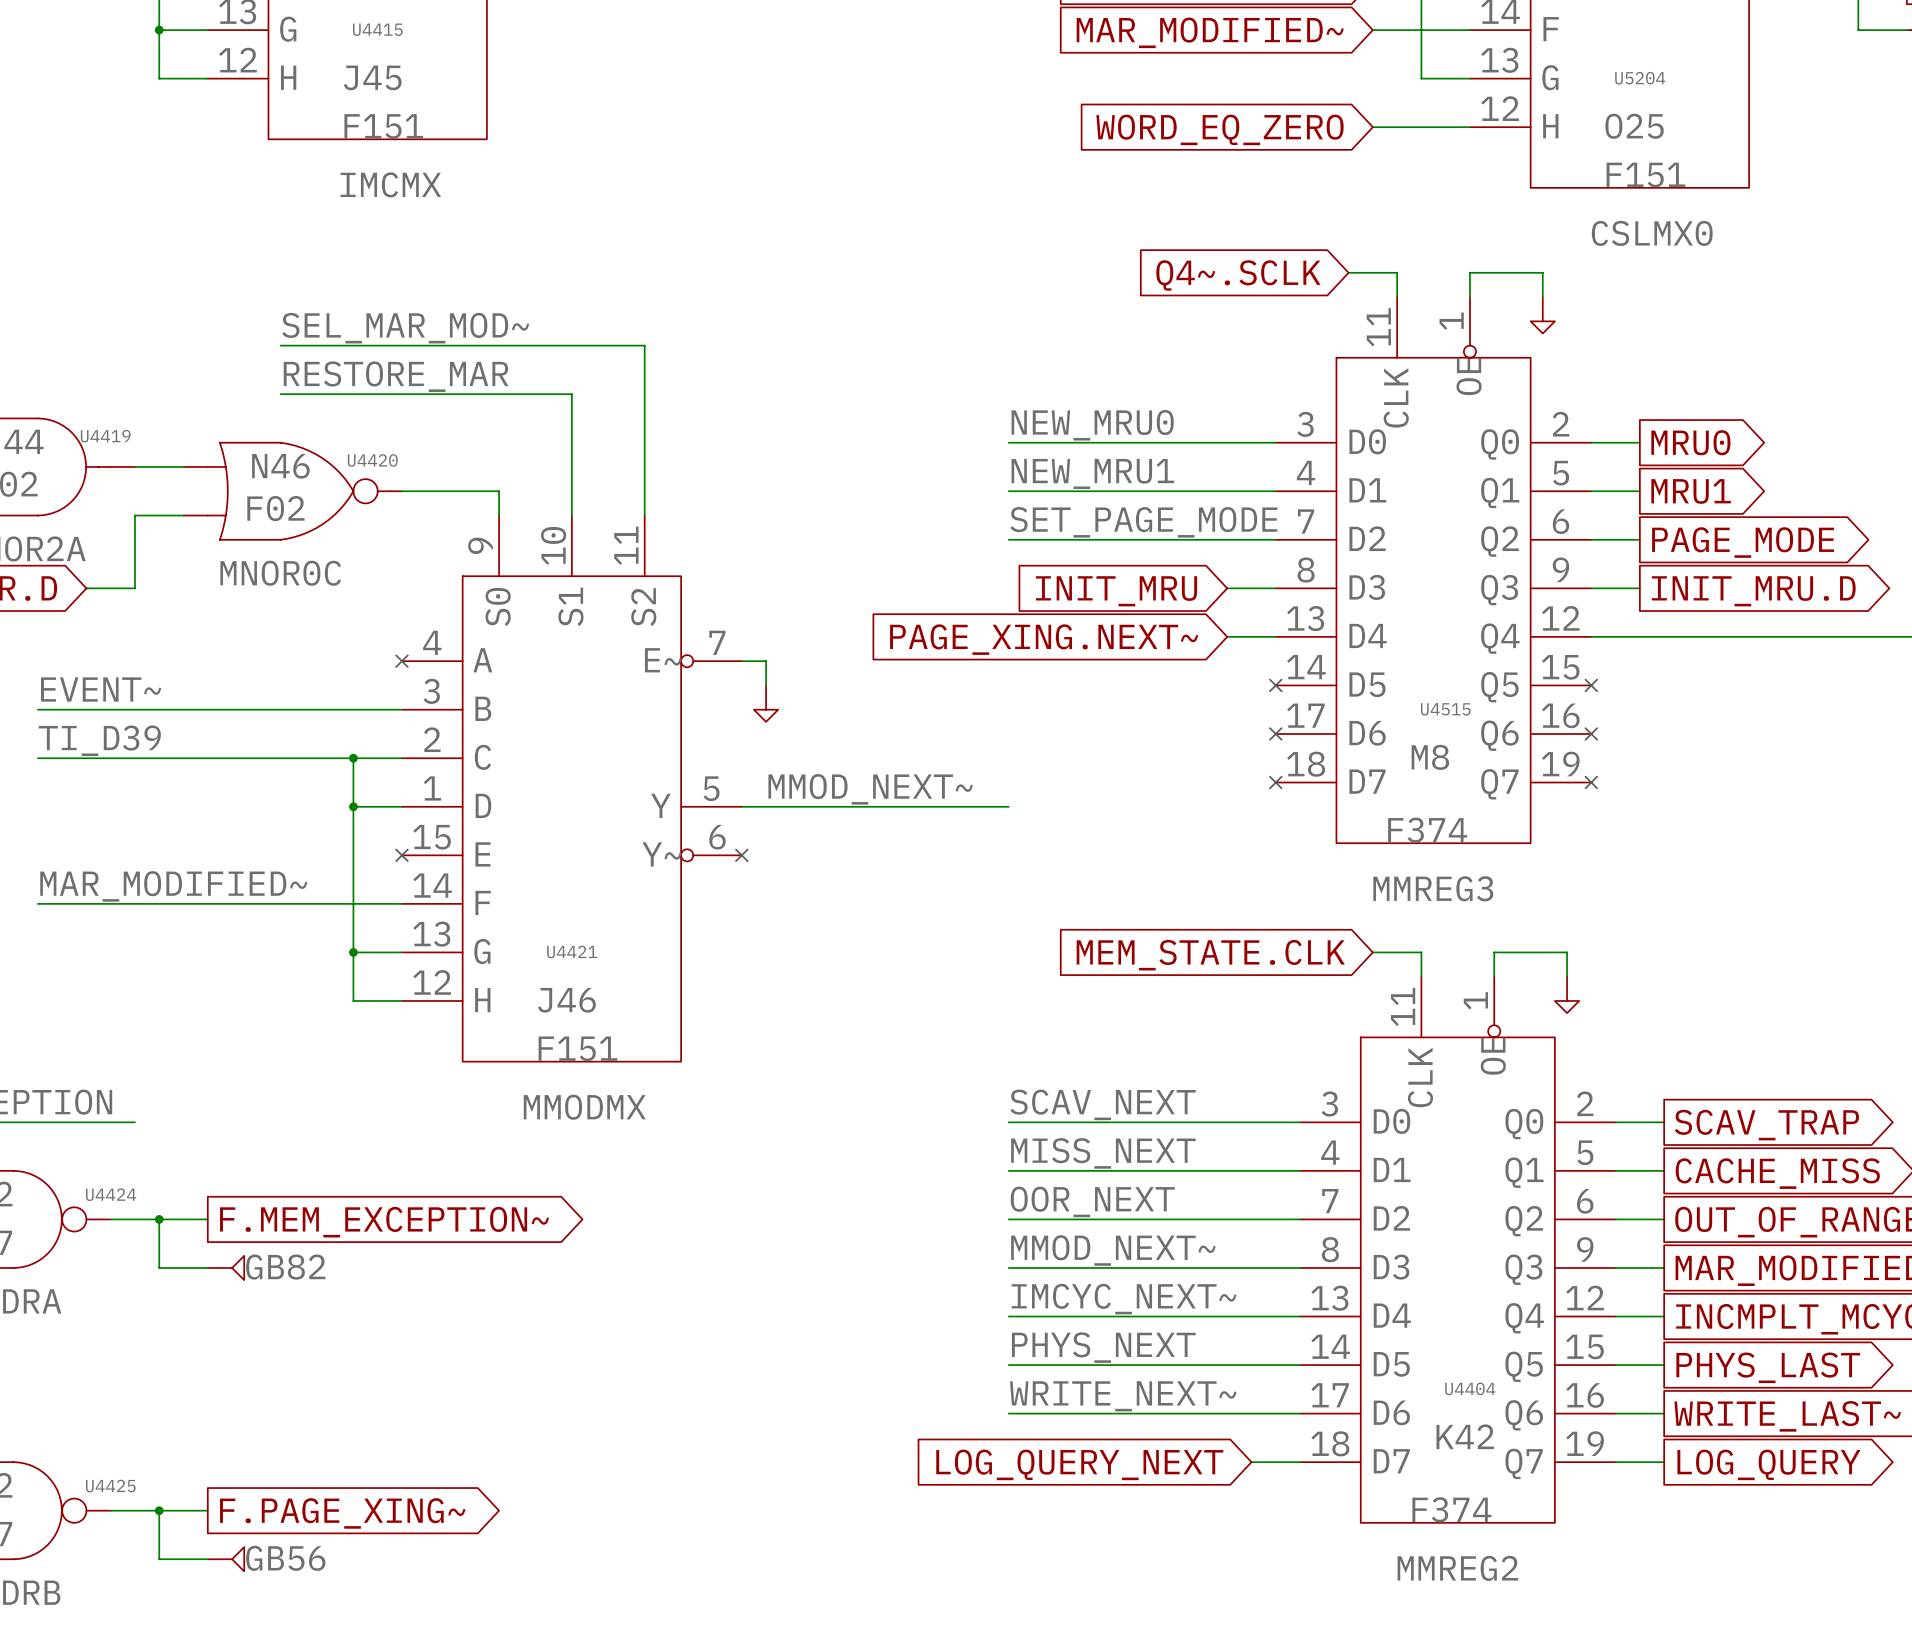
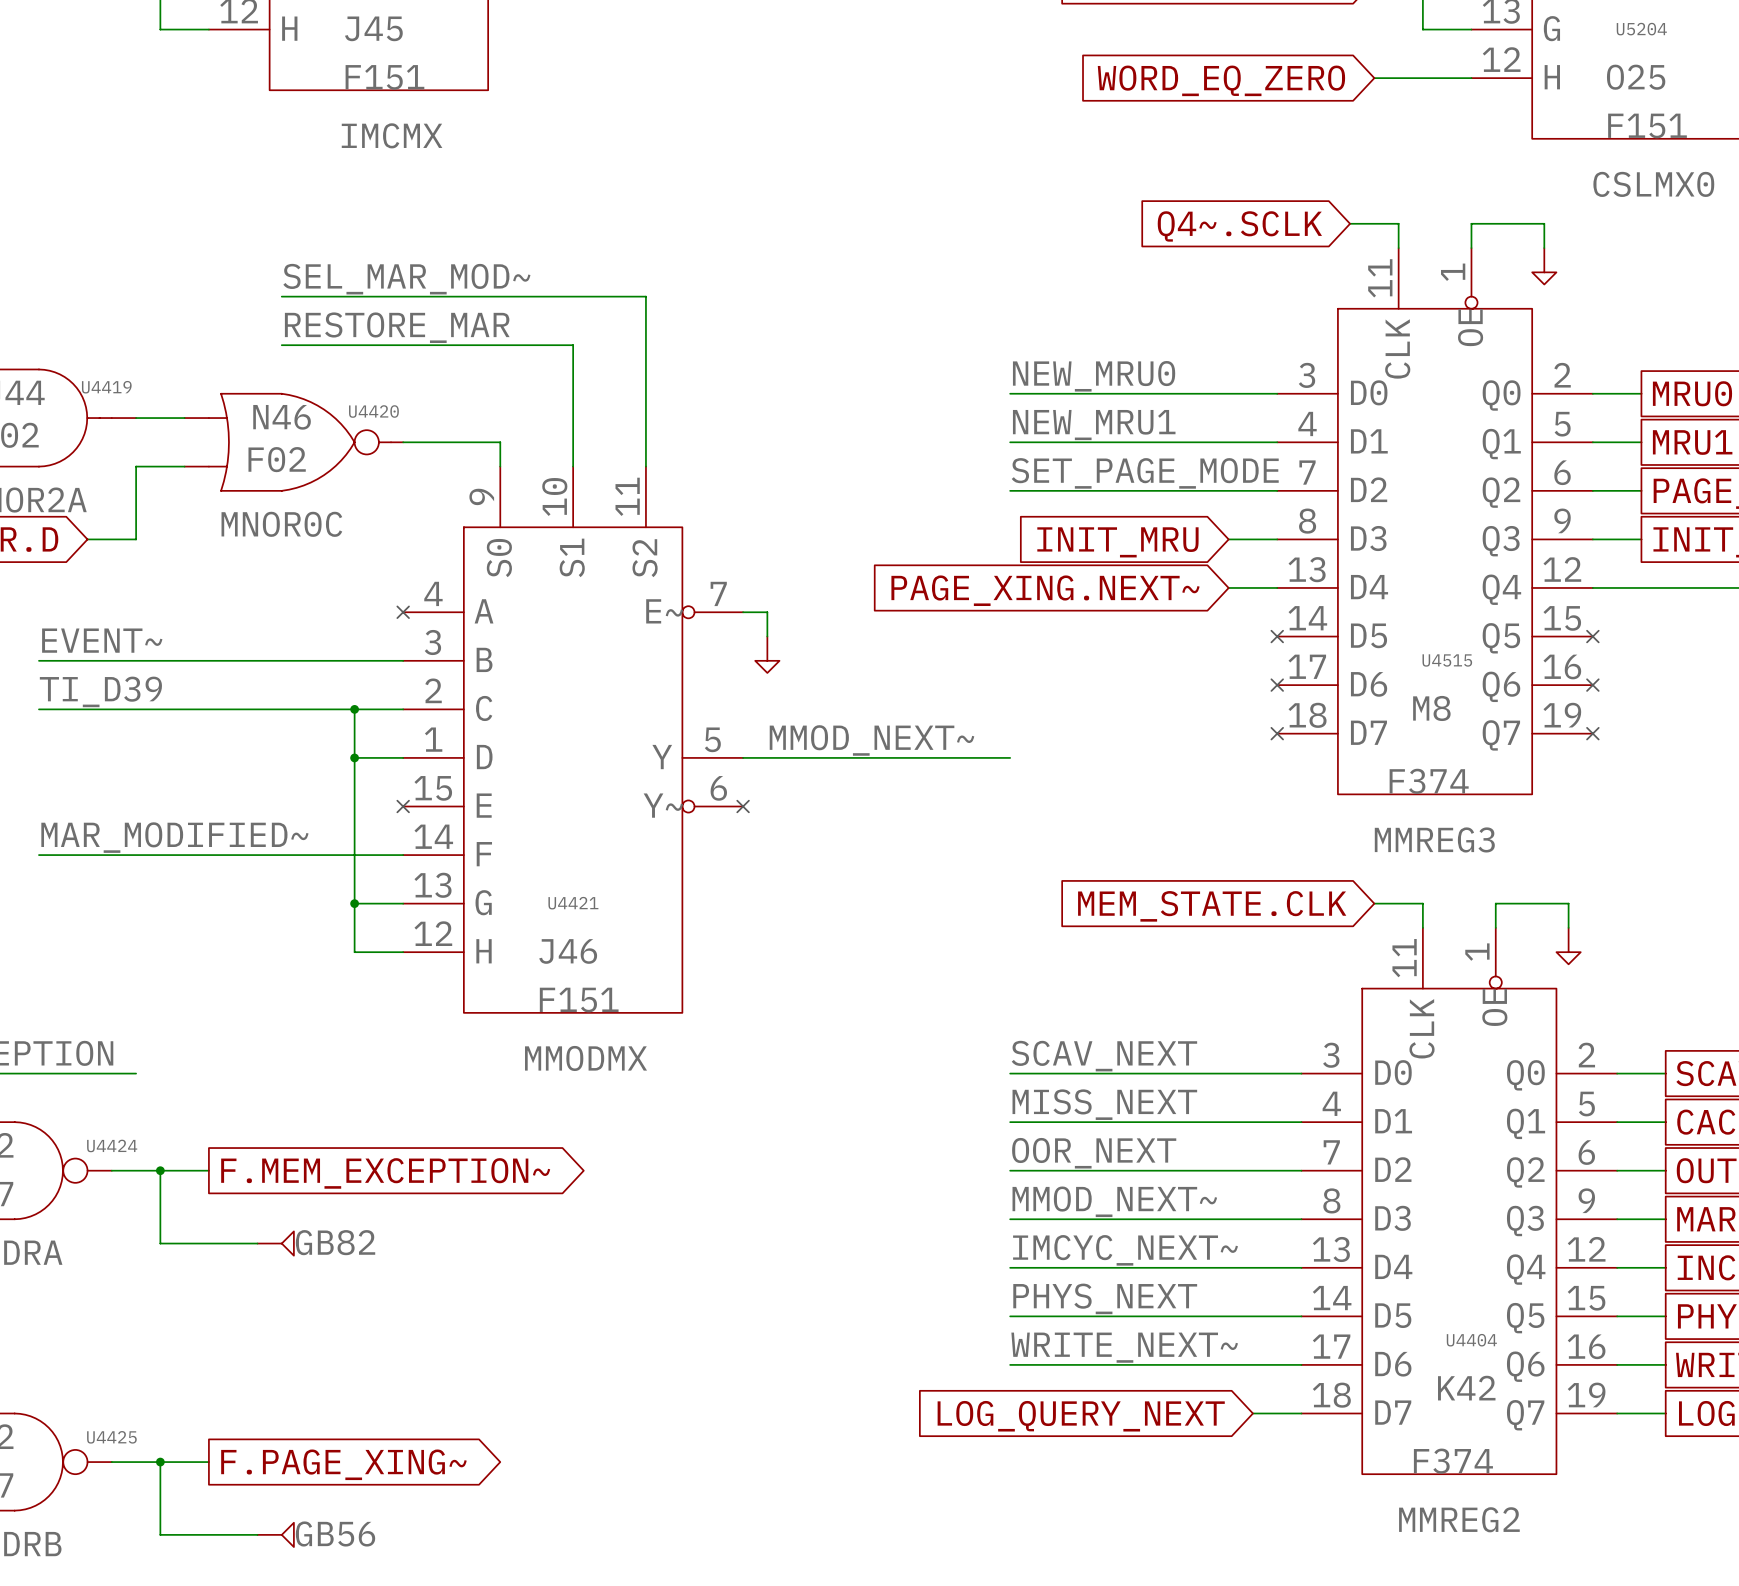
wire: (159, 1267) (207, 1267) -> (160, 1219) (160, 1243) (257, 1243)
GB82 position: (226, 1267) -> (276, 1243)
wire: (159, 1559) (207, 1559) -> (160, 1510) (160, 1534) (257, 1534)
GB56 position: (226, 1559) -> (276, 1534)

